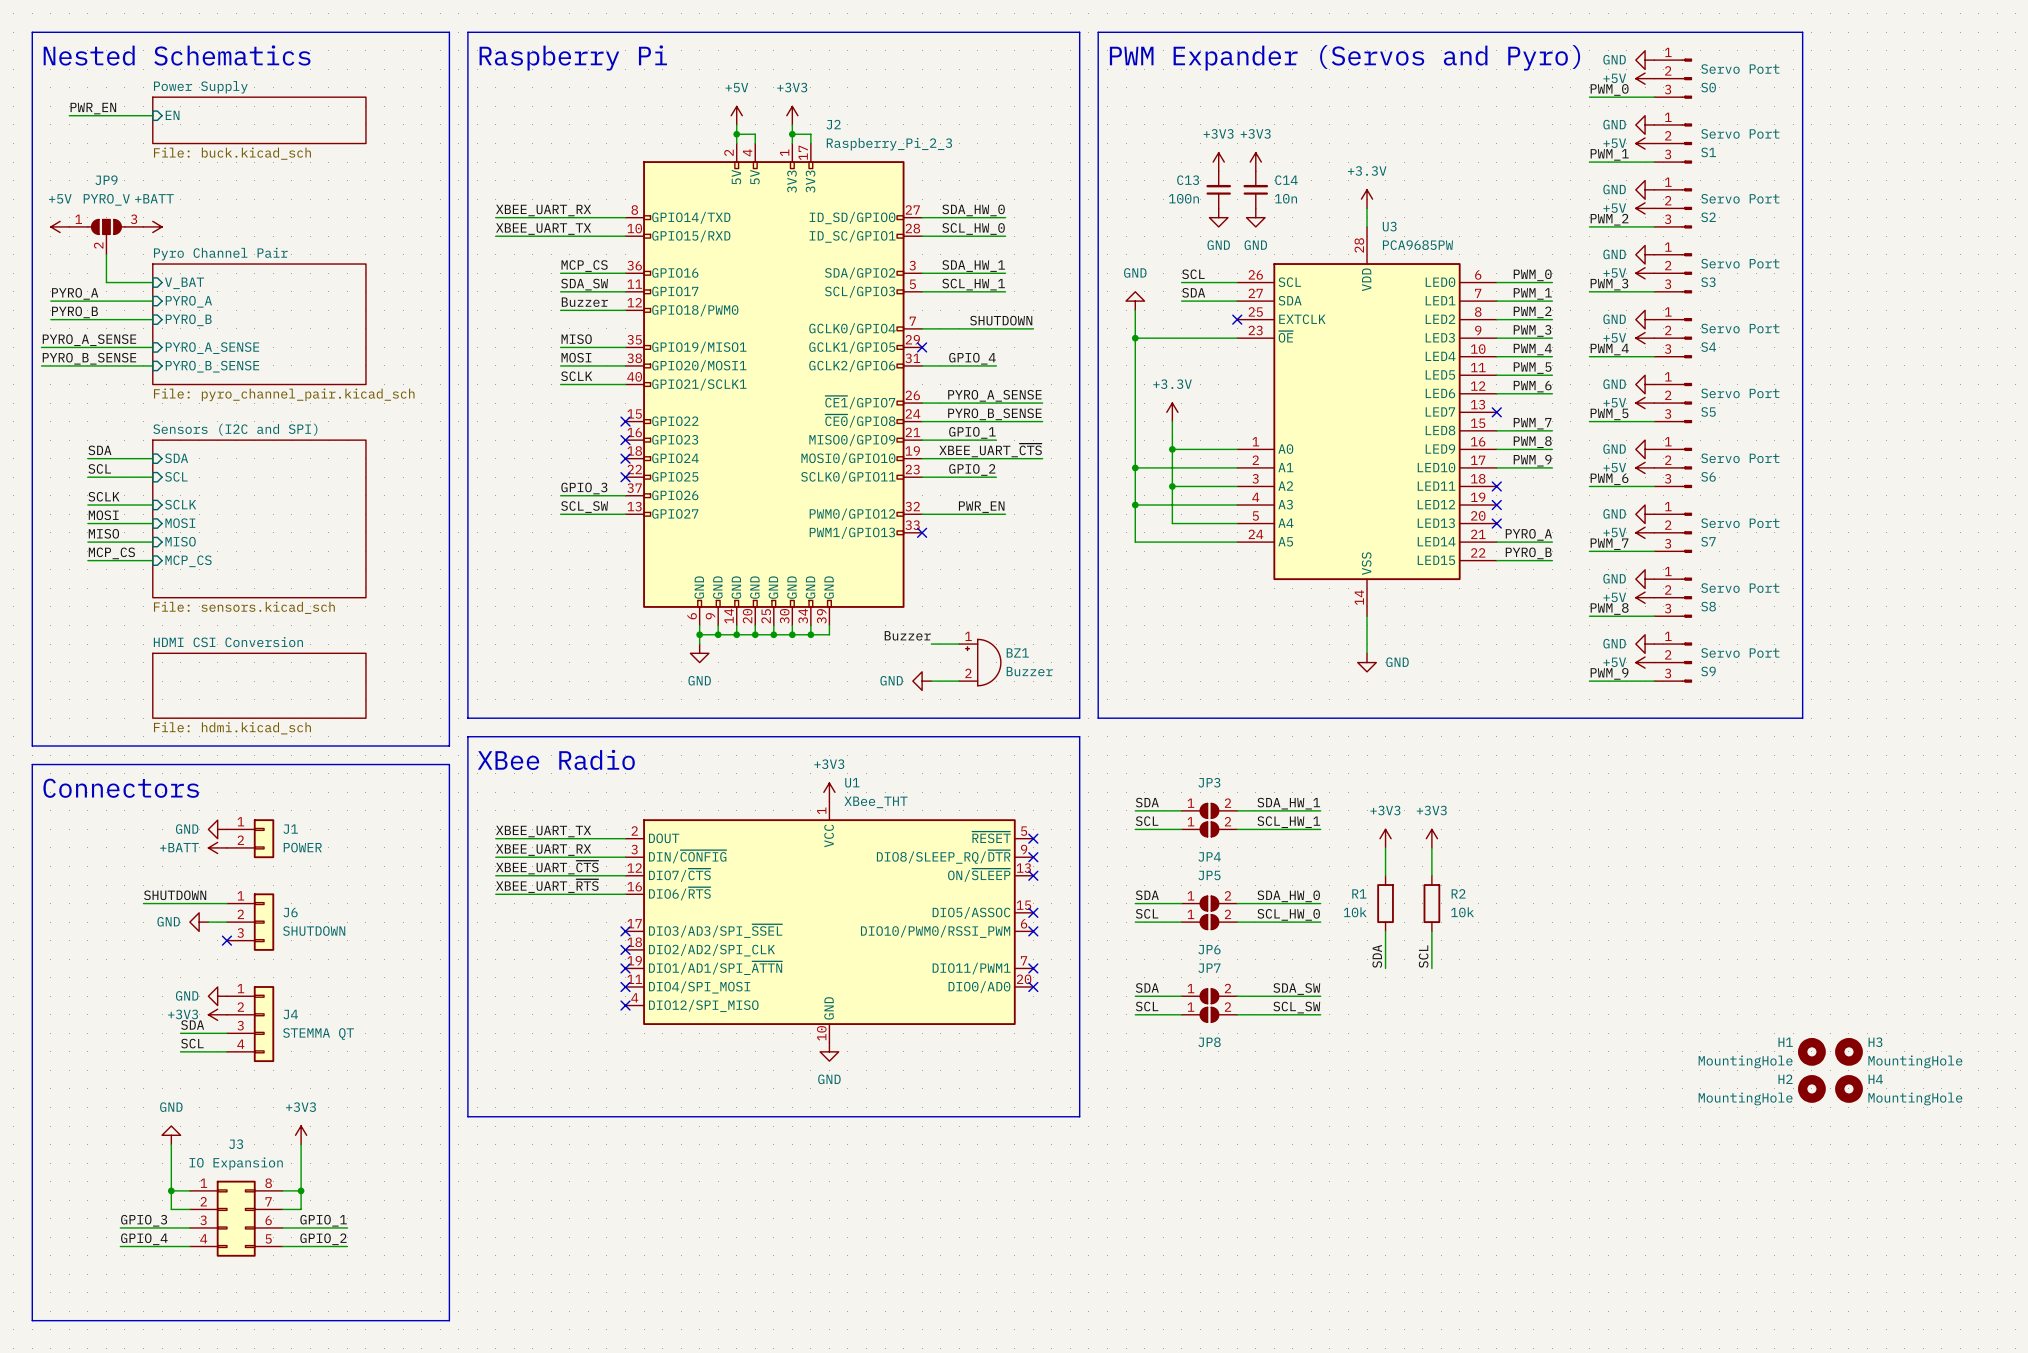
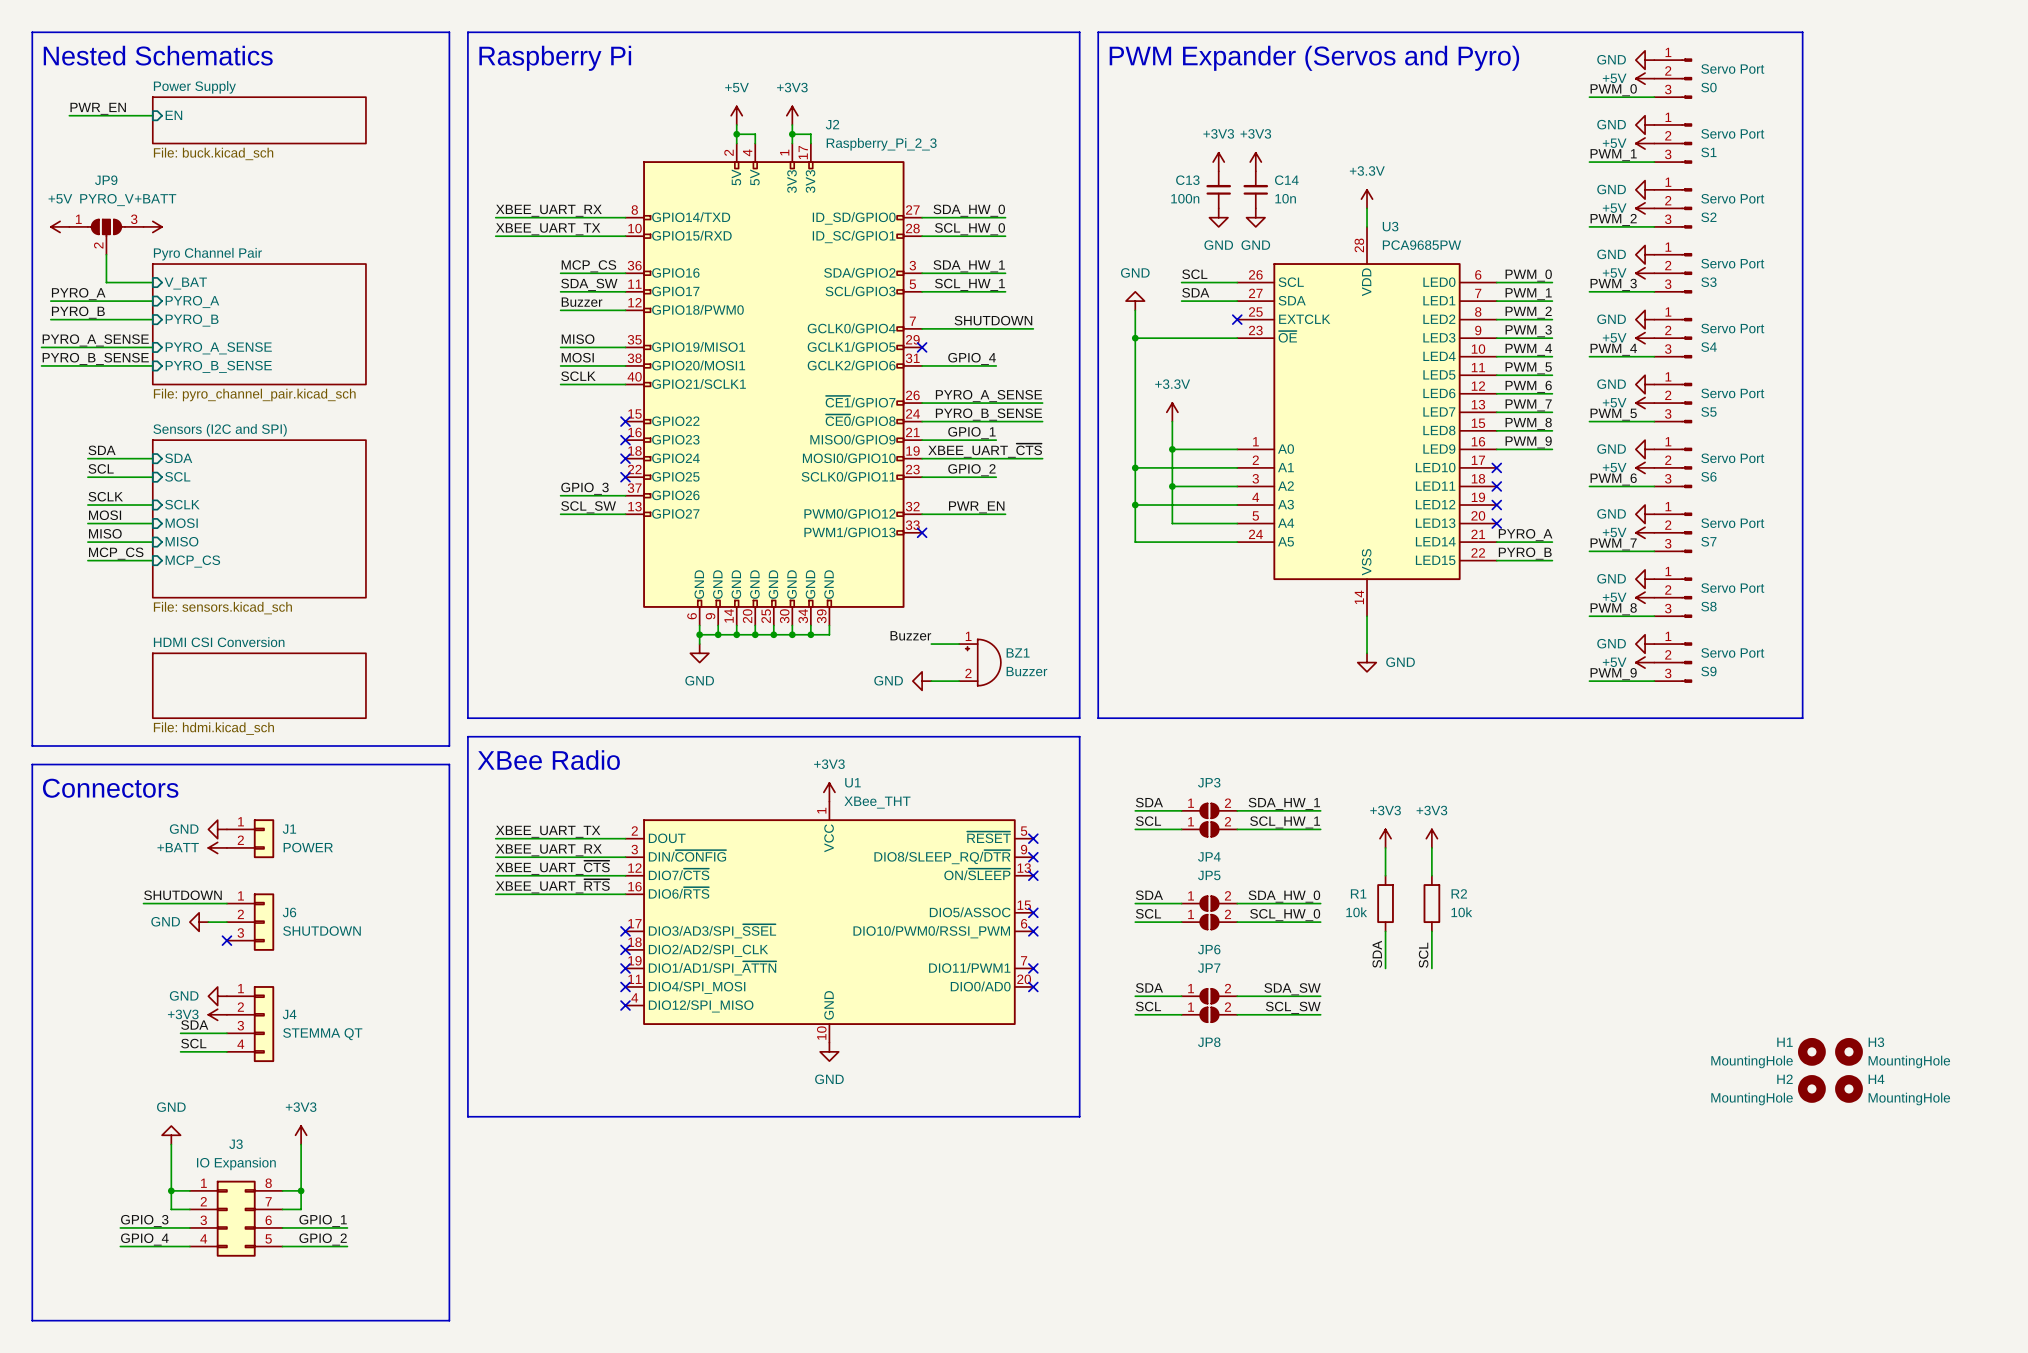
label: none -> PWM_7 (1528, 405)
no-connect mark: (1496, 412) -> none
label: PWM_7 (1532, 423) -> PWM_8 (1528, 423)
label: PWM_8 (1532, 442) -> PWM_9 (1528, 442)
label: PWM_9 (1532, 460) -> none
wire: (1496, 467) (1552, 467) -> (1496, 412) (1552, 412)
no-connect mark: none -> (1496, 467)

